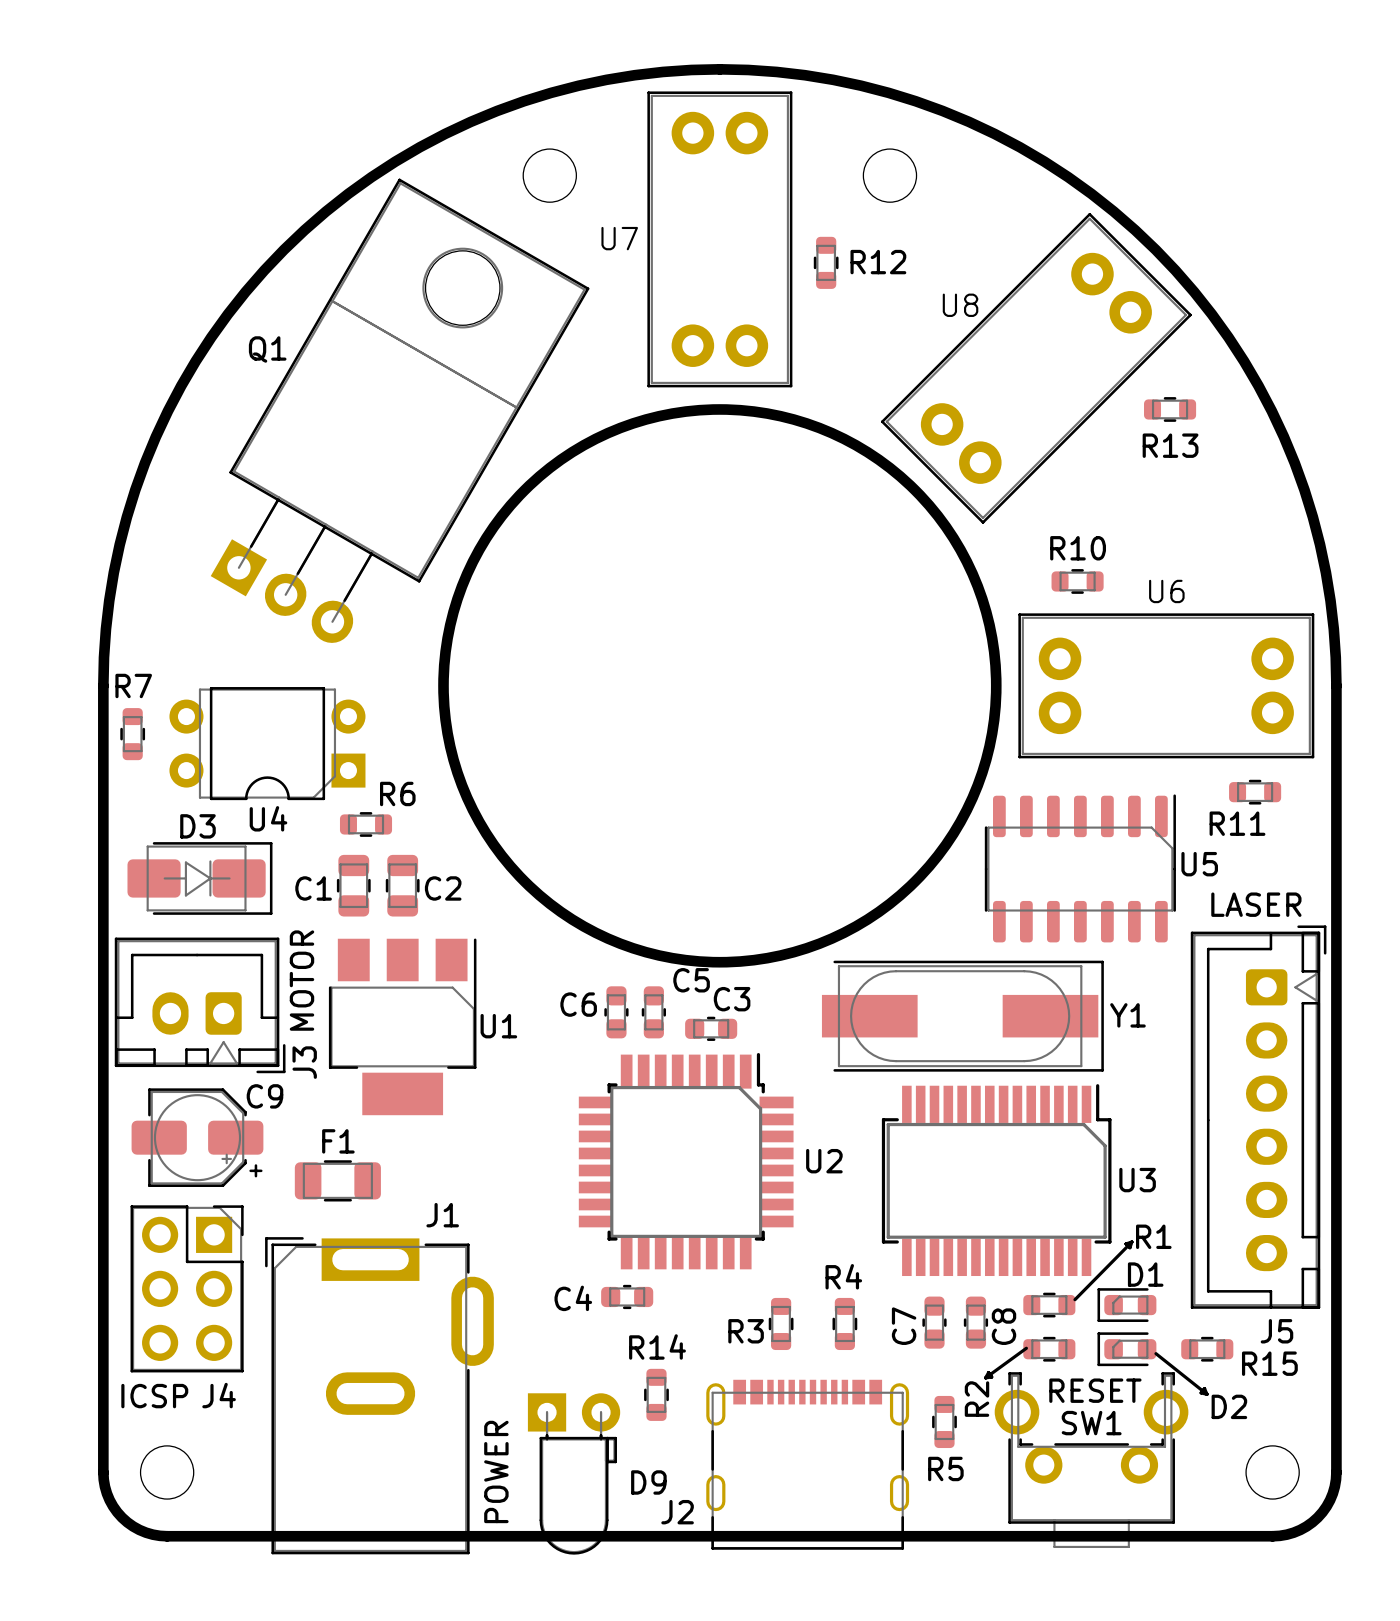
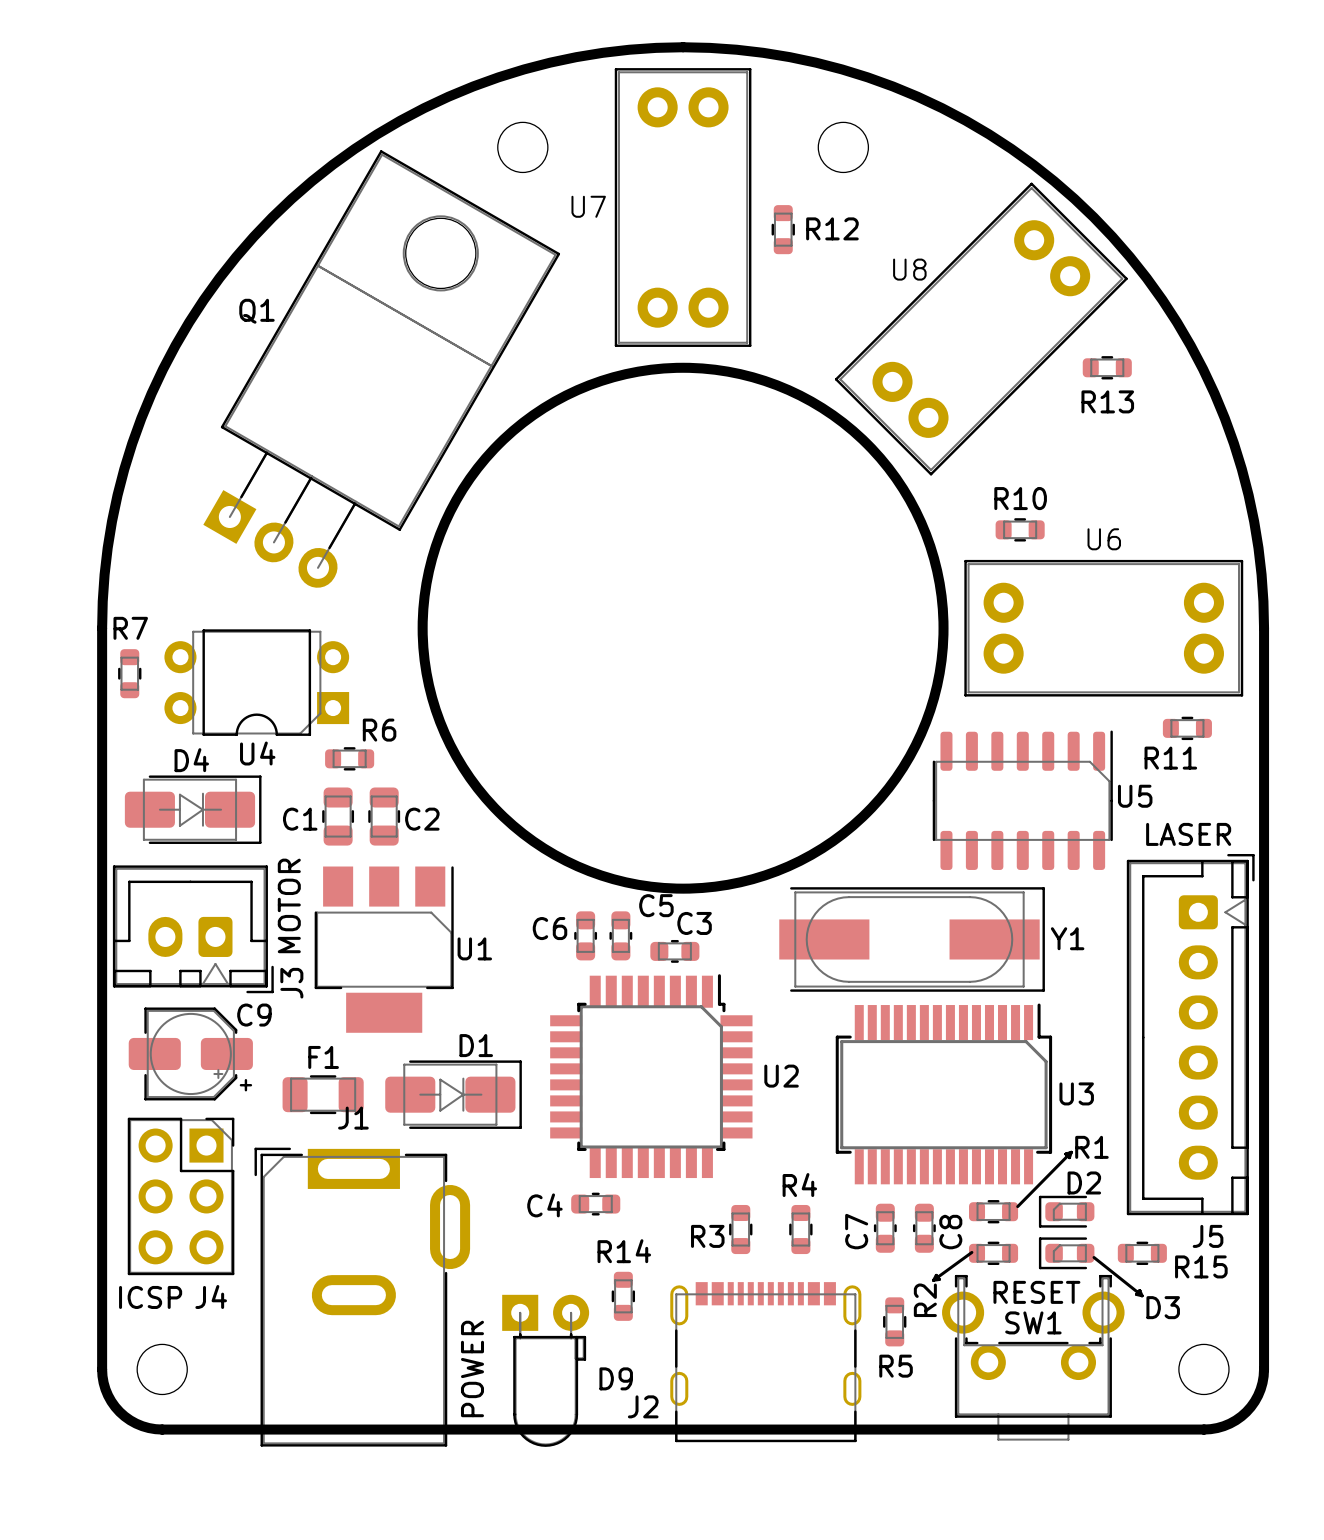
D3 name: D3 (197, 826) -> D4 (191, 760)
D1: none -> (453, 1094)
J1 name position: J1 (442, 1215) -> J1 (353, 1118)
D1 name: D1 (1145, 1274) -> D2 (1084, 1182)
D2 name: D2 (1229, 1406) -> D3 (1163, 1307)

